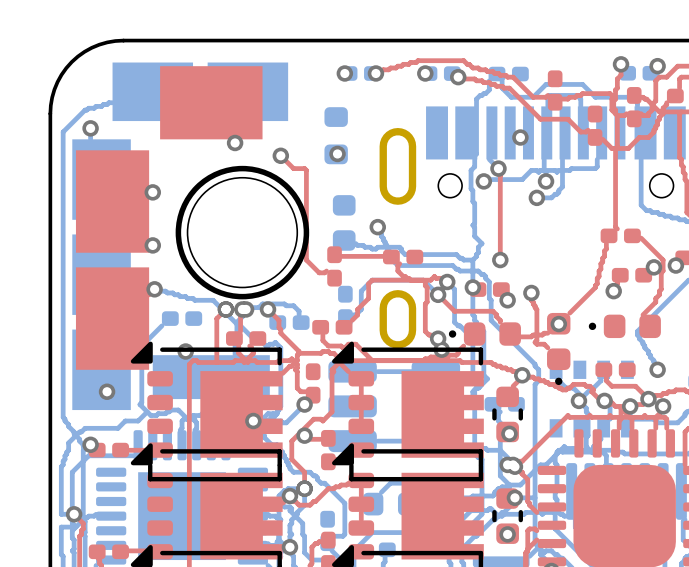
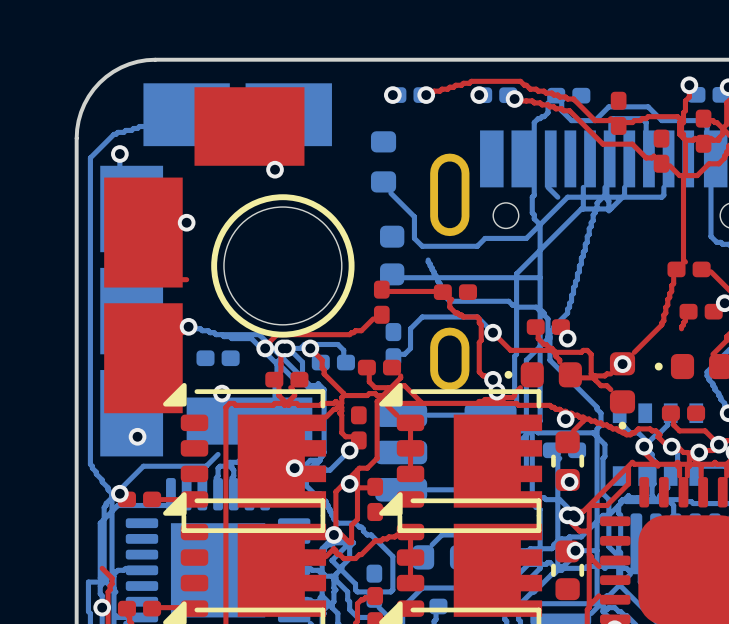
via: (520, 137) -> none
via: (337, 153) -> none
bottom track: (476, 153) (474, 155) (474, 166) (471, 170) (471, 188) (474, 203) (474, 223) (472, 225) (474, 227) (474, 236) (482, 243) (472, 260) -> (534, 181) (532, 212) (534, 218) (540, 224) (540, 421) (516, 444)
top track: (280, 155) (293, 168) (304, 168) (306, 170) (306, 260) (319, 272) (326, 271) -> none
via: (280, 155) -> none
bottom track: none -> (583, 187) (583, 208) (610, 208) (624, 195) (624, 187)
bottom track: none -> (604, 187) (604, 195) (597, 203) (597, 208) (593, 214) (567, 313) (553, 326) (549, 336) (526, 360) (526, 472) (516, 478)
bottom track: (562, 159) (562, 186) (558, 192) (551, 197) (536, 197) -> none
top track: (498, 168) (500, 175) (500, 260) -> none
via: (498, 168) -> none
bottom track: (571, 168) (557, 172) (555, 170) (540, 170) (538, 172) (531, 170) (522, 179) -> (636, 197) (567, 197) (526, 238) (485, 238) (477, 246) (422, 246) (414, 238) (414, 216) (390, 193)
bottom track: (520, 179) (485, 179) (483, 181) -> (581, 208) (516, 273) (516, 354) (514, 356) (514, 393) (516, 395) (516, 403)
via: (483, 181) -> none
via: (546, 181) -> none
via: (536, 197) -> none
via: (377, 227) -> none
bottom track: (355, 243) (372, 249) (399, 247) (405, 254) (456, 254) (463, 260) (472, 260) -> (404, 277) (540, 277)
via: (152, 245) -> none
bottom track: (472, 260) (472, 314) (476, 324) (483, 331) (483, 375) (487, 378) (472, 391) (472, 404) (460, 404) -> none
via: (500, 260) -> none
top track: (410, 280) (372, 280) (368, 283) (368, 298) (357, 309) (357, 314) (352, 320) -> none
top track: (423, 280) (430, 280) (434, 276) (443, 278) (447, 282) -> none
top track: none -> (373, 318) (361, 330) (355, 330) (349, 334) (276, 334) (263, 348)
bottom track: (447, 282) (454, 289) (454, 322) (467, 333) (472, 335) (472, 380) (480, 386) -> none
via: (447, 282) -> none
via: (472, 287) -> none
via: (613, 291) -> none
top track: (531, 292) (531, 300) (536, 309) (536, 340) (535, 342) (538, 344) -> (538, 334) (538, 338) (555, 352) (581, 352) (587, 350) (591, 354) (591, 373) (601, 385)
via: (531, 292) -> none
bottom track: none -> (221, 334) (259, 334) (312, 387) (320, 387)
bottom track: (286, 305) (284, 303) (262, 303) (258, 307) (247, 307) (246, 309) -> (330, 344) (304, 344) (300, 348) (288, 348) (302, 362) (302, 377)
top track: (225, 309) (216, 318) (216, 362) -> none
bottom track: (161, 325) (141, 347) (141, 402) (139, 404) (150, 415) (178, 410) (187, 419) -> none
top track: (341, 360) (332, 369) (333, 371) (332, 373) (332, 411) (322, 421) (313, 419) (291, 442) -> (400, 375) (377, 401) (377, 458) (367, 468) (359, 468) (335, 491)
via position: (522, 375) -> (565, 419)
bottom track: none -> (516, 426) (520, 430) (536, 430) (538, 432) (593, 432) (604, 444) (602, 493) (608, 499) (608, 546) (620, 560) (620, 582)
top track: none -> (644, 452) (657, 466)
bottom track: none -> (218, 454) (206, 466) (143, 466) (106, 503) (104, 507) (104, 580) (115, 591)
bottom track: (147, 411) (138, 421) (125, 421) (118, 428) (85, 428) (68, 442) (68, 450) (61, 466) (61, 514) (74, 514) -> none
top track: none -> (677, 466) (679, 468) (679, 476)
bottom track: (498, 421) (500, 422) (500, 475) (509, 485) -> (557, 468) (557, 568) (551, 574)
top track: none -> (628, 468) (628, 483) (606, 505) (591, 505)
top track: none -> (357, 470) (357, 519) (351, 525) (351, 542)
top track: (291, 459) (304, 472) (304, 488) -> (335, 509) (335, 529) (349, 542)
top track: none -> (565, 517) (579, 531) (587, 531)
top track: (514, 466) (527, 479) -> (589, 507) (589, 531)
via: none -> (333, 534)
via: (304, 488) -> none
via: (289, 496) -> none
bottom track: (275, 501) (278, 501) (284, 506) (289, 506) (291, 508) (289, 510) (302, 523) (304, 545) -> (320, 572) (324, 576) (331, 576) (347, 591) (347, 599) (349, 601)
bottom track: none -> (318, 554) (328, 544) (349, 542) (331, 560) (355, 584) (357, 591) (367, 591)
via: (74, 514) -> none
bottom track: none -> (630, 574) (599, 603) (522, 603)
top track: (527, 530) (529, 528) (536, 530) -> (589, 586) (589, 554)
via: (507, 534) -> none
via: (289, 547) -> none
via: none -> (102, 607)
bottom track: none -> (115, 615) (117, 617) (125, 617)

